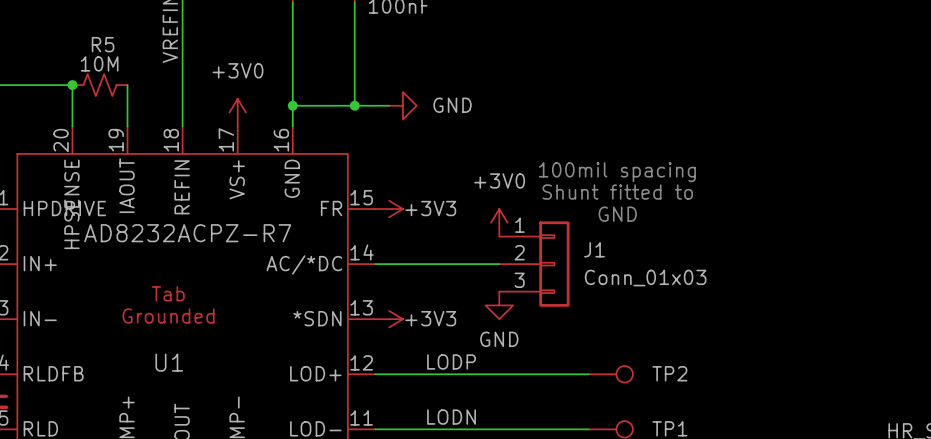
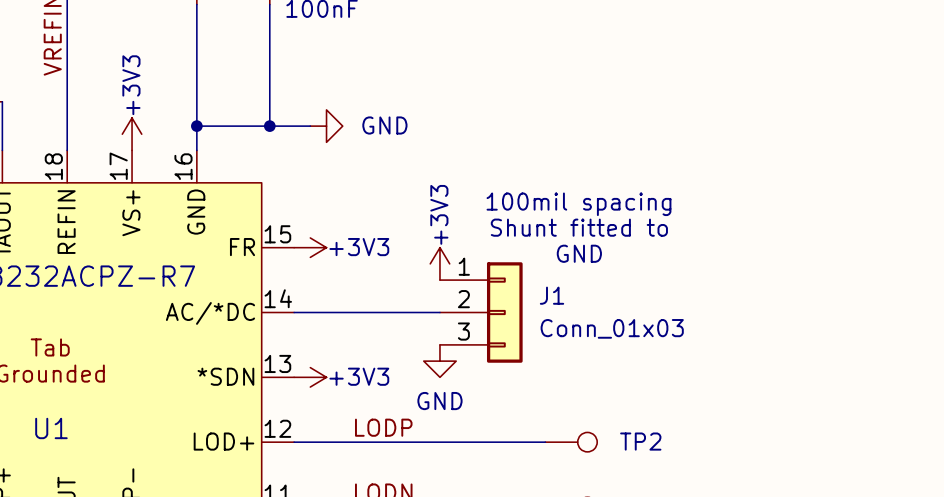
power symbol: +3V0 (237, 112) -> +3V3 (132, 134)
power symbol: +3V0 (499, 222) -> +3V3 (439, 263)

